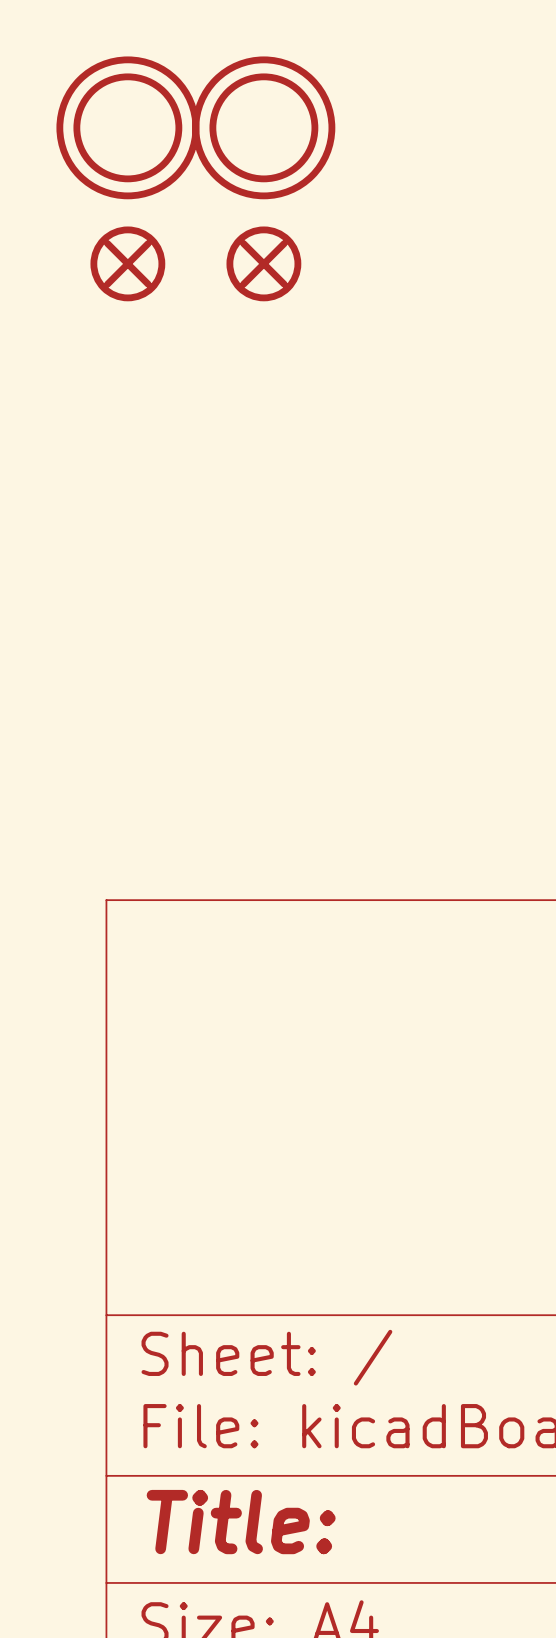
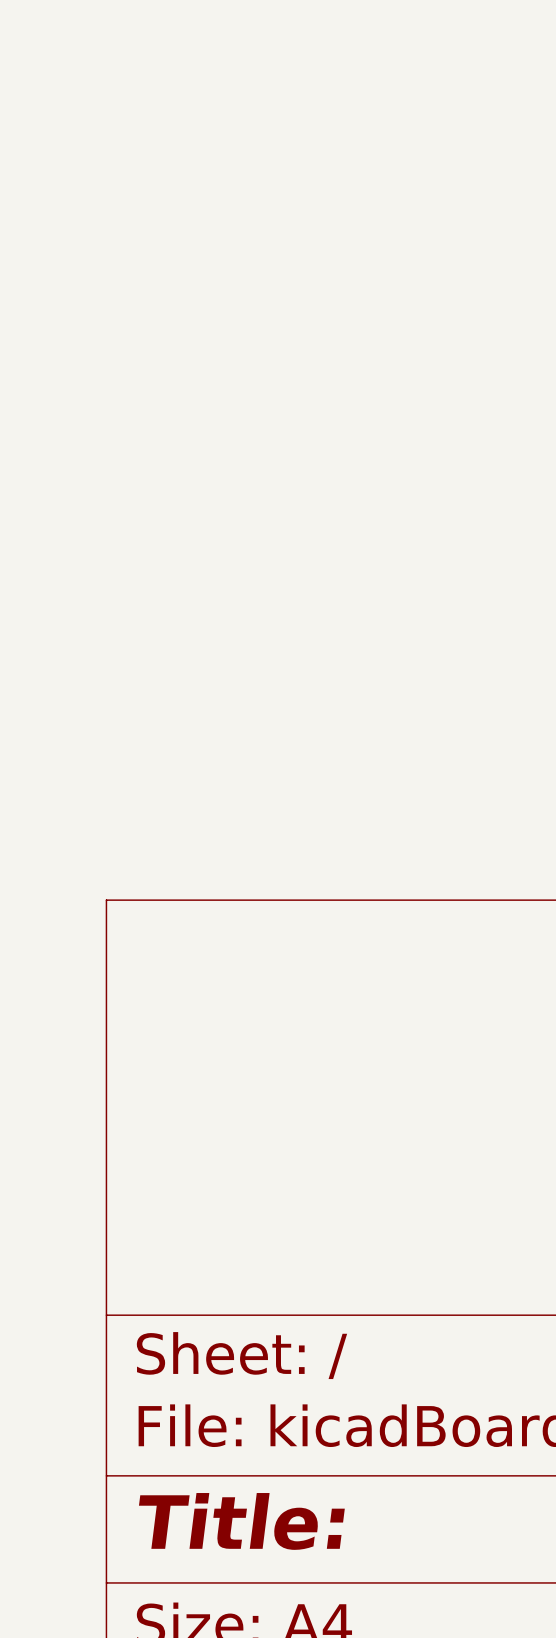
part: (127, 127) -> none
part: (263, 127) -> none
part: (127, 263) -> none
part: (263, 263) -> none

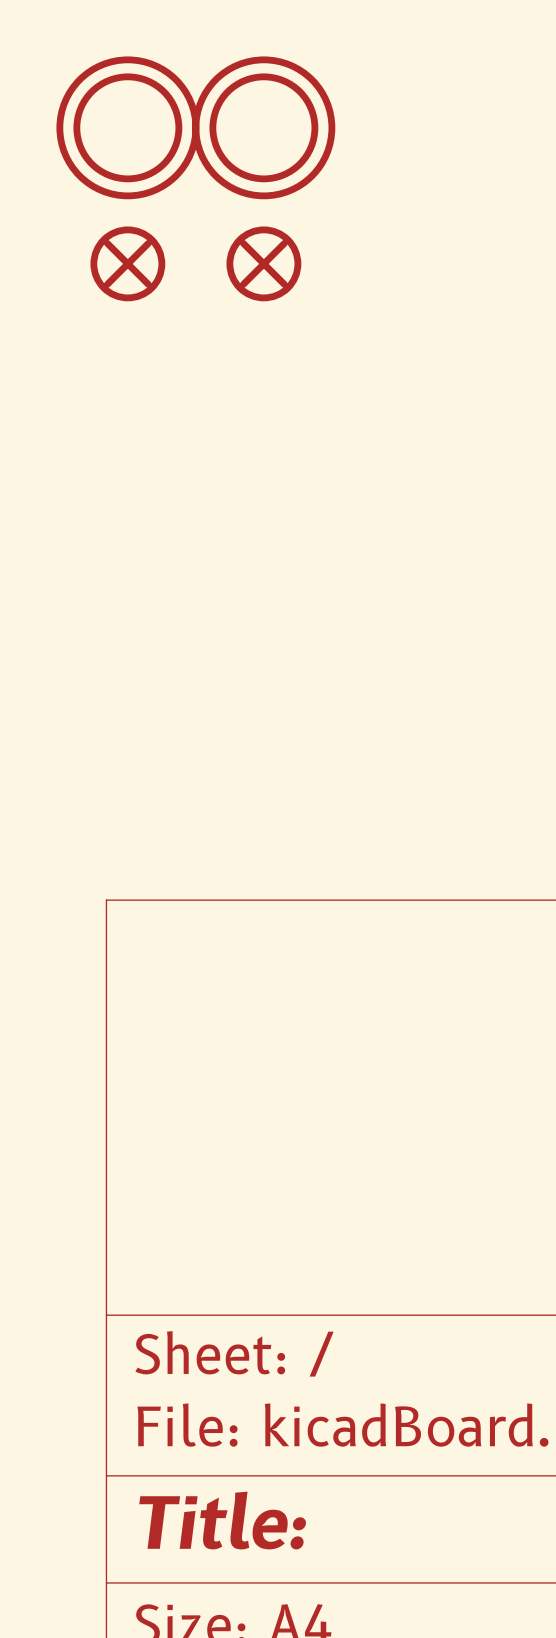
part: none -> (127, 127)
part: none -> (263, 127)
part: none -> (127, 263)
part: none -> (263, 263)

